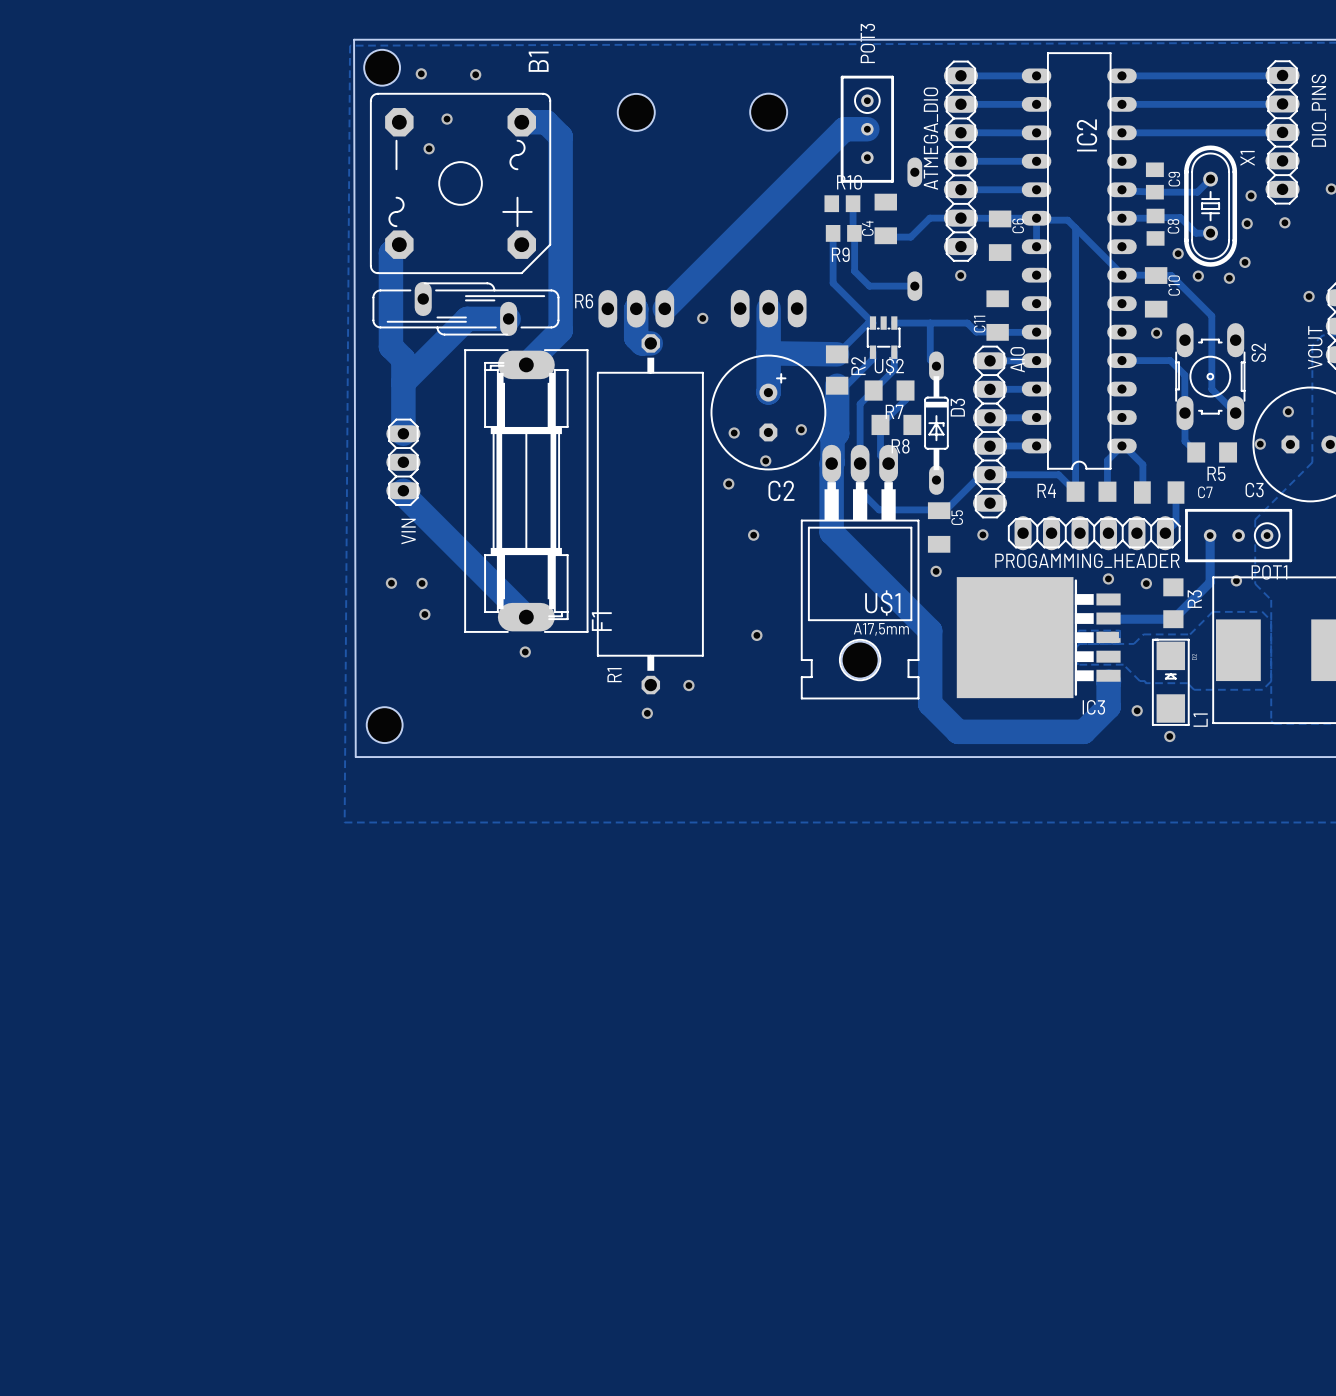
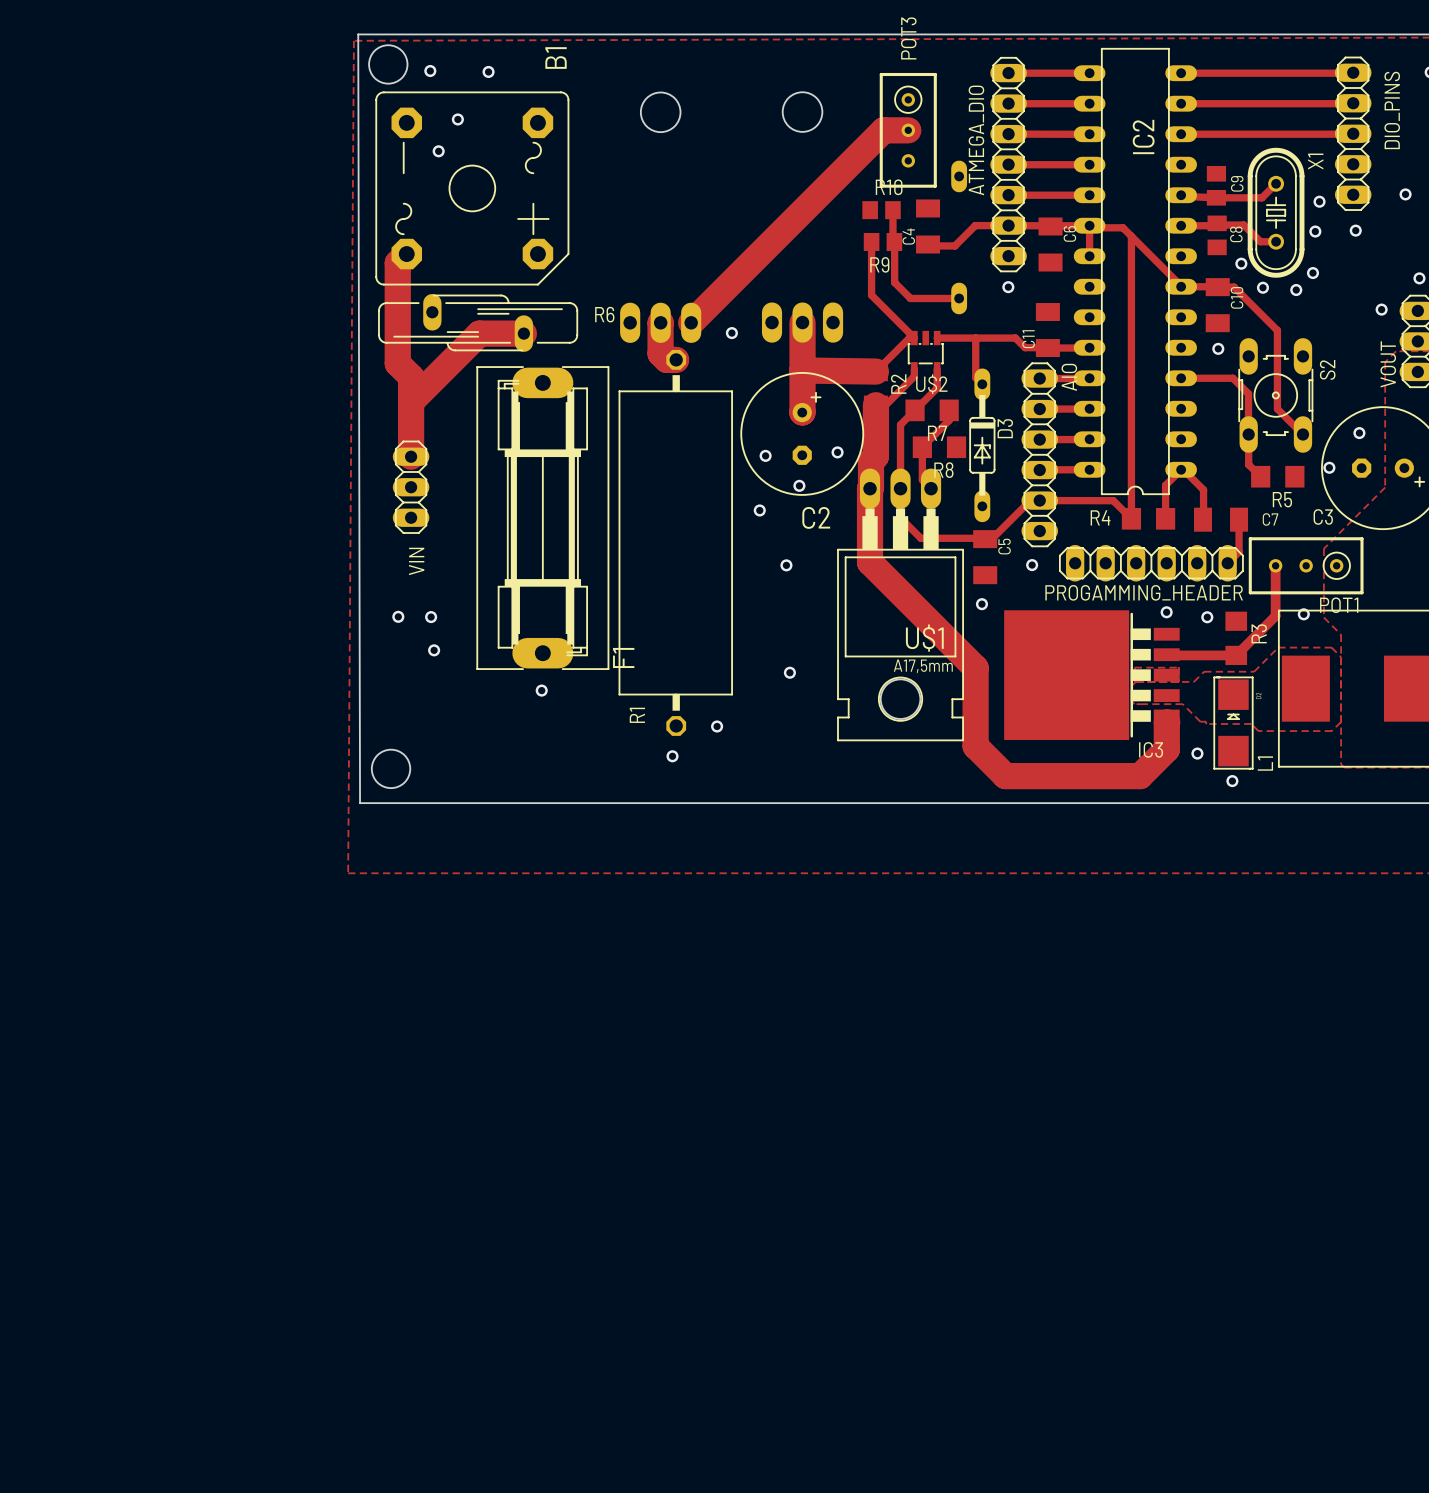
track: (521, 122) (546, 122) (560, 136) (560, 330) (526, 364) -> none
track: (403, 490) (403, 494) (526, 617) -> none

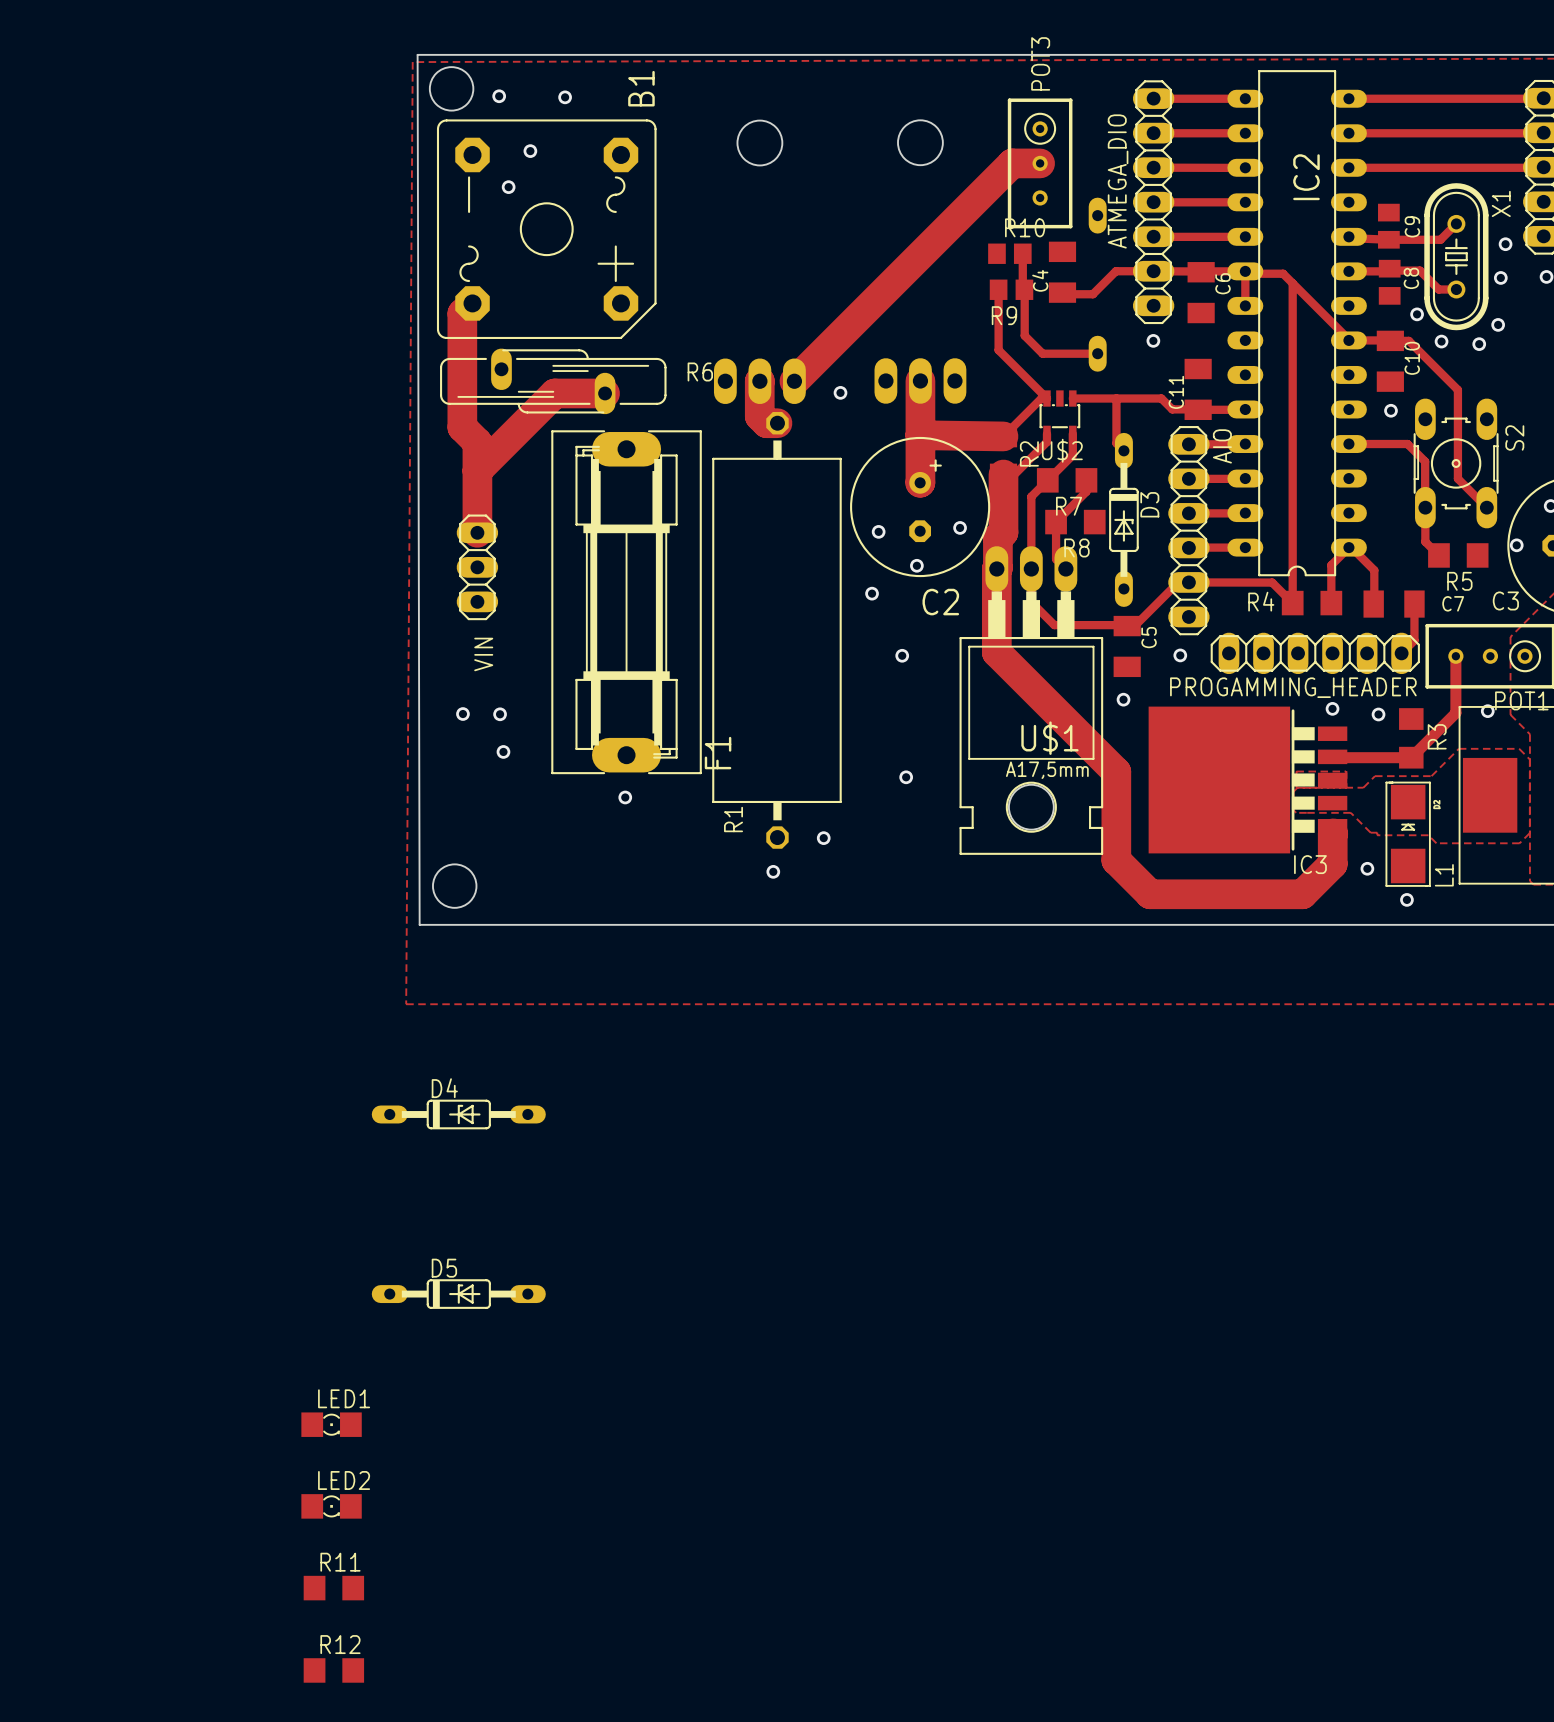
D4: none -> (458, 1114)
D5: none -> (458, 1294)
LED1: none -> (331, 1424)
LED2: none -> (331, 1506)
R11: none -> (333, 1588)
R12: none -> (333, 1670)

